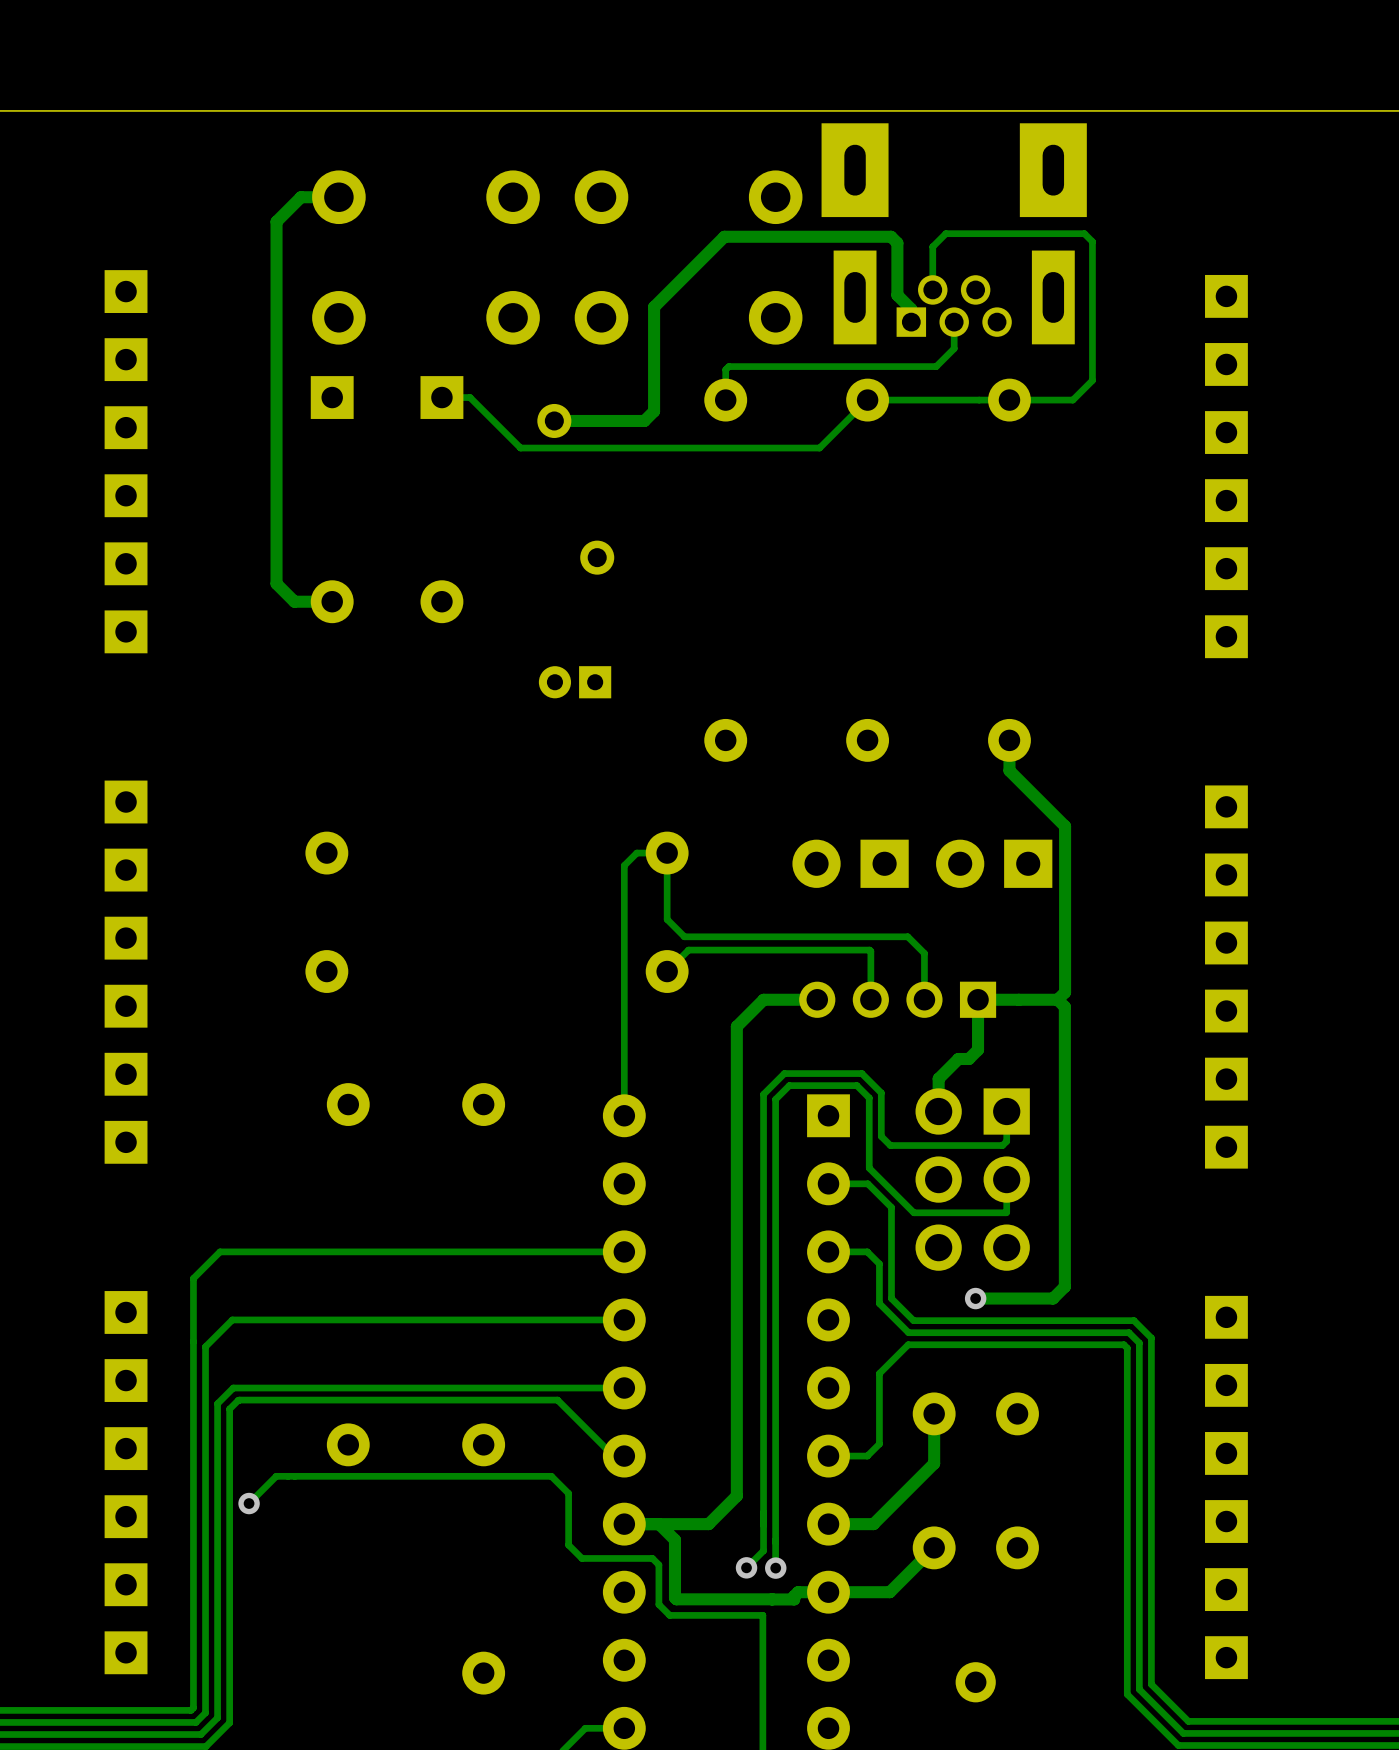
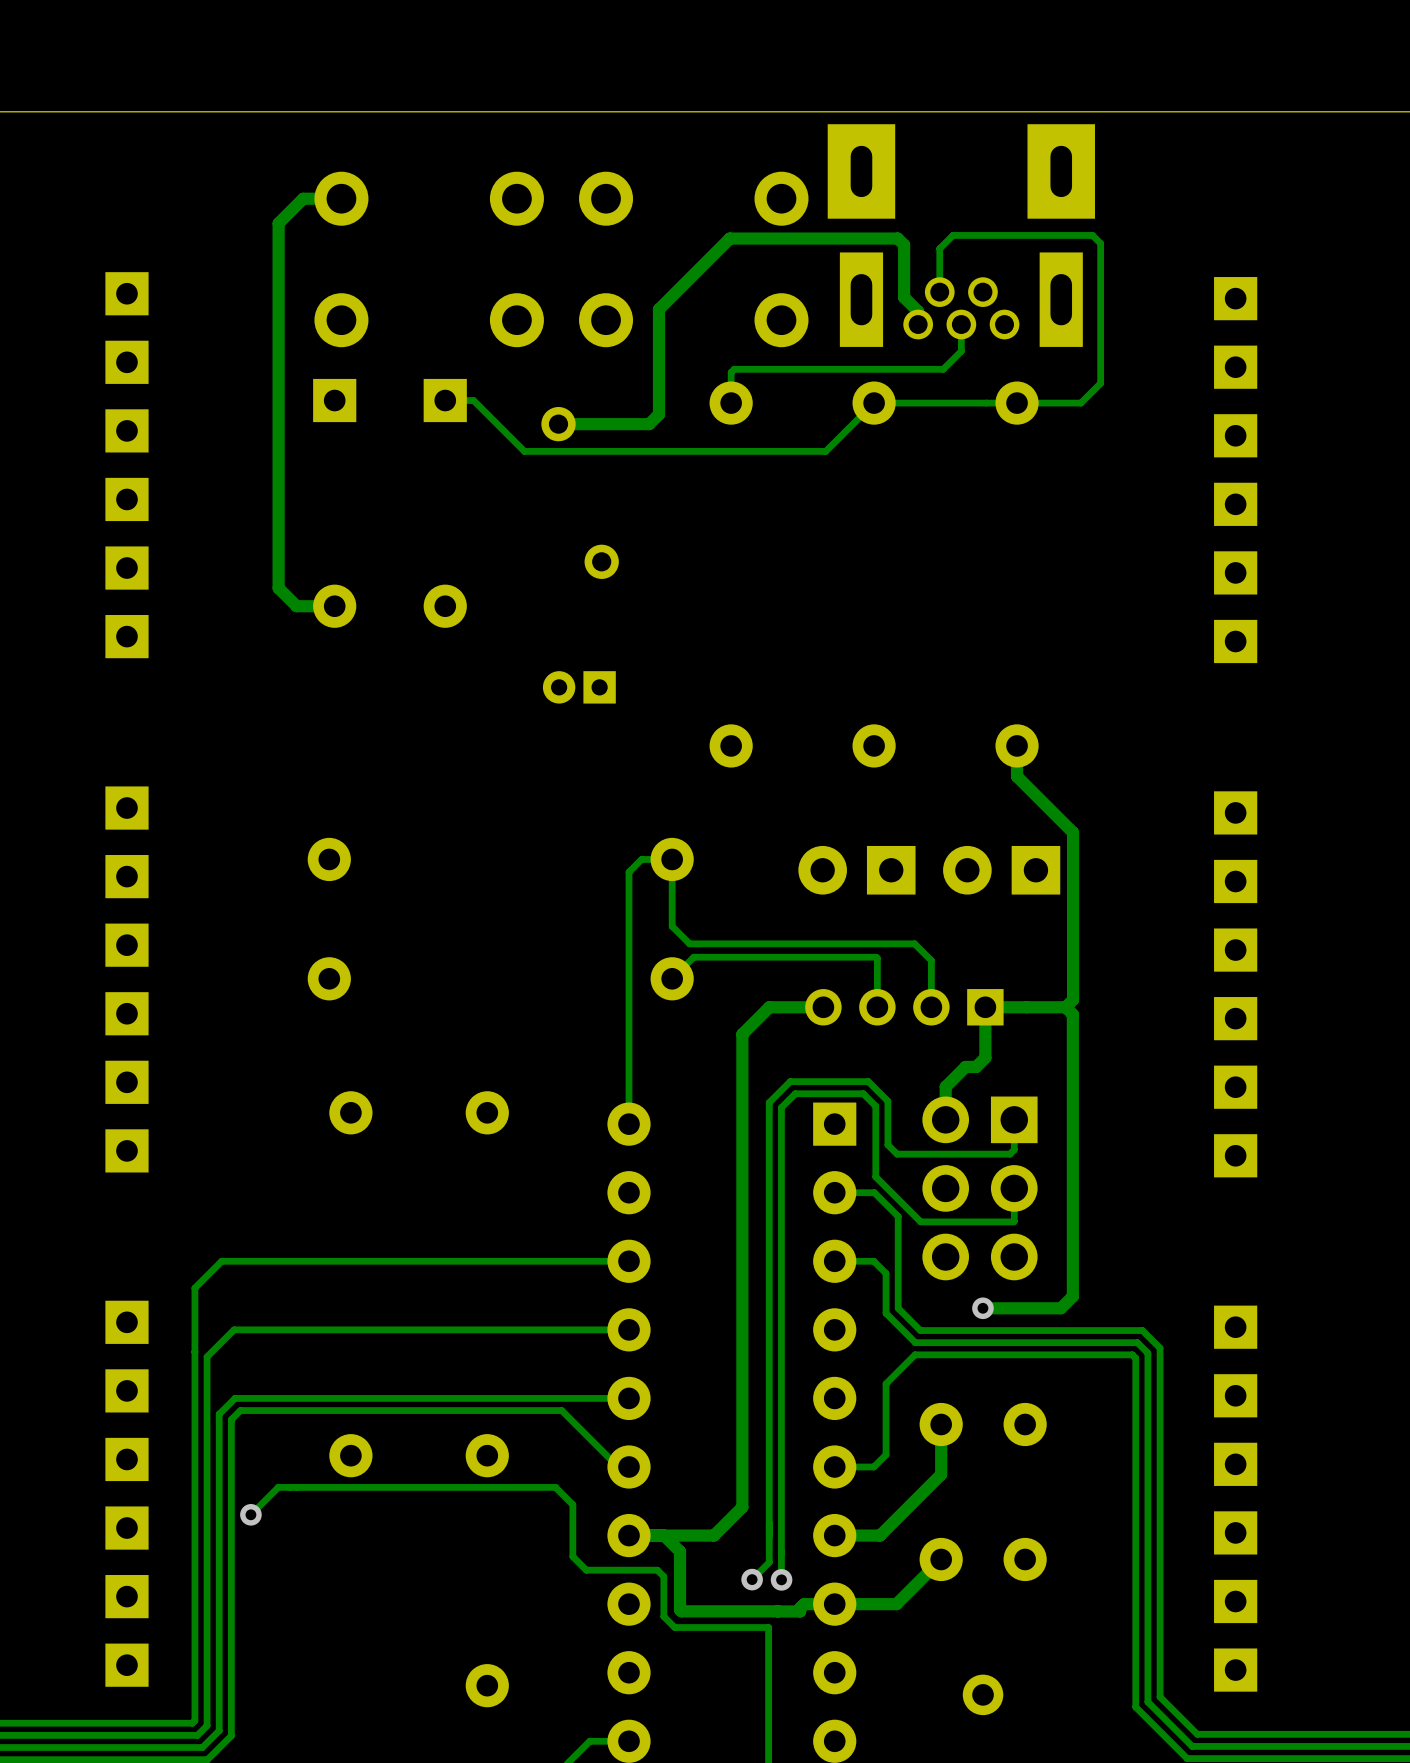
part footprint: [821, 123, 1087, 345] -> [827, 124, 1095, 347]

